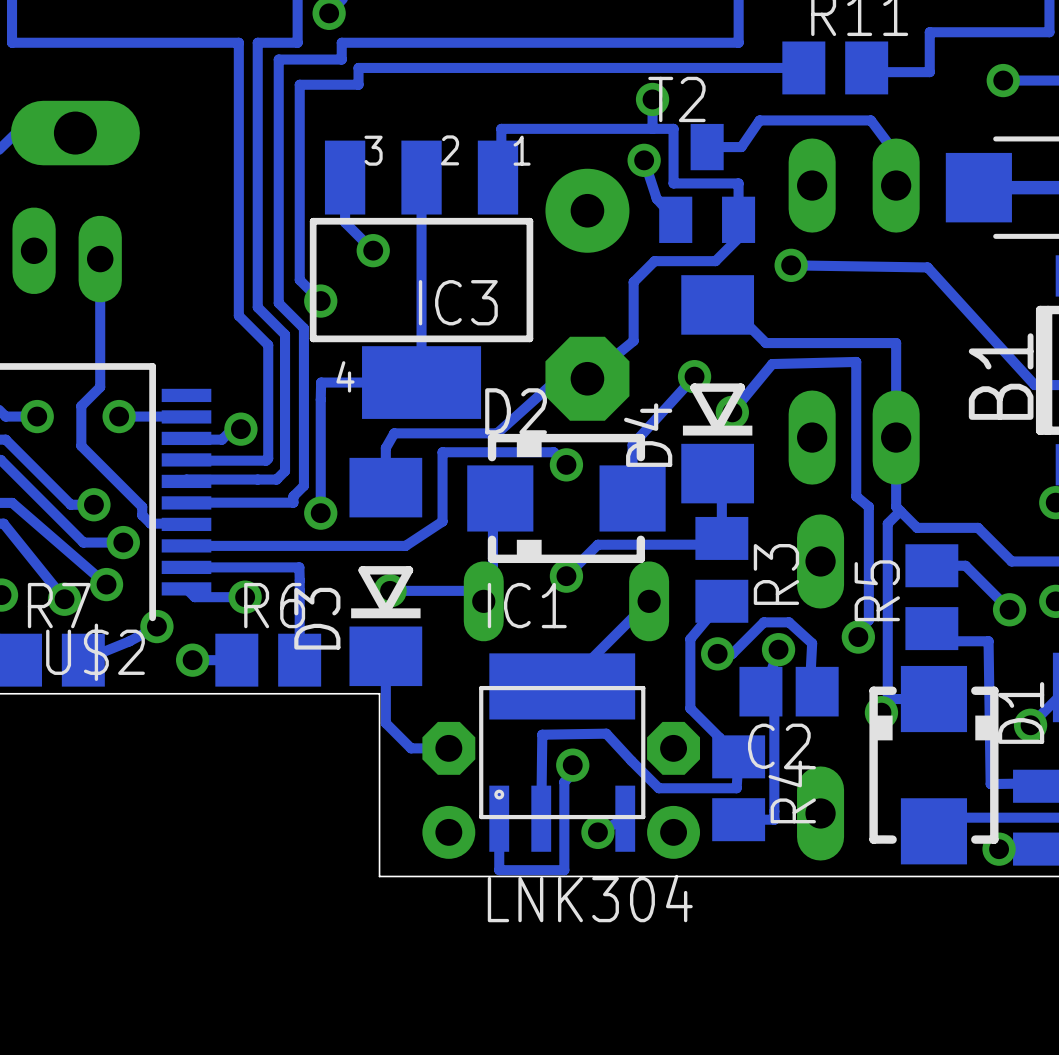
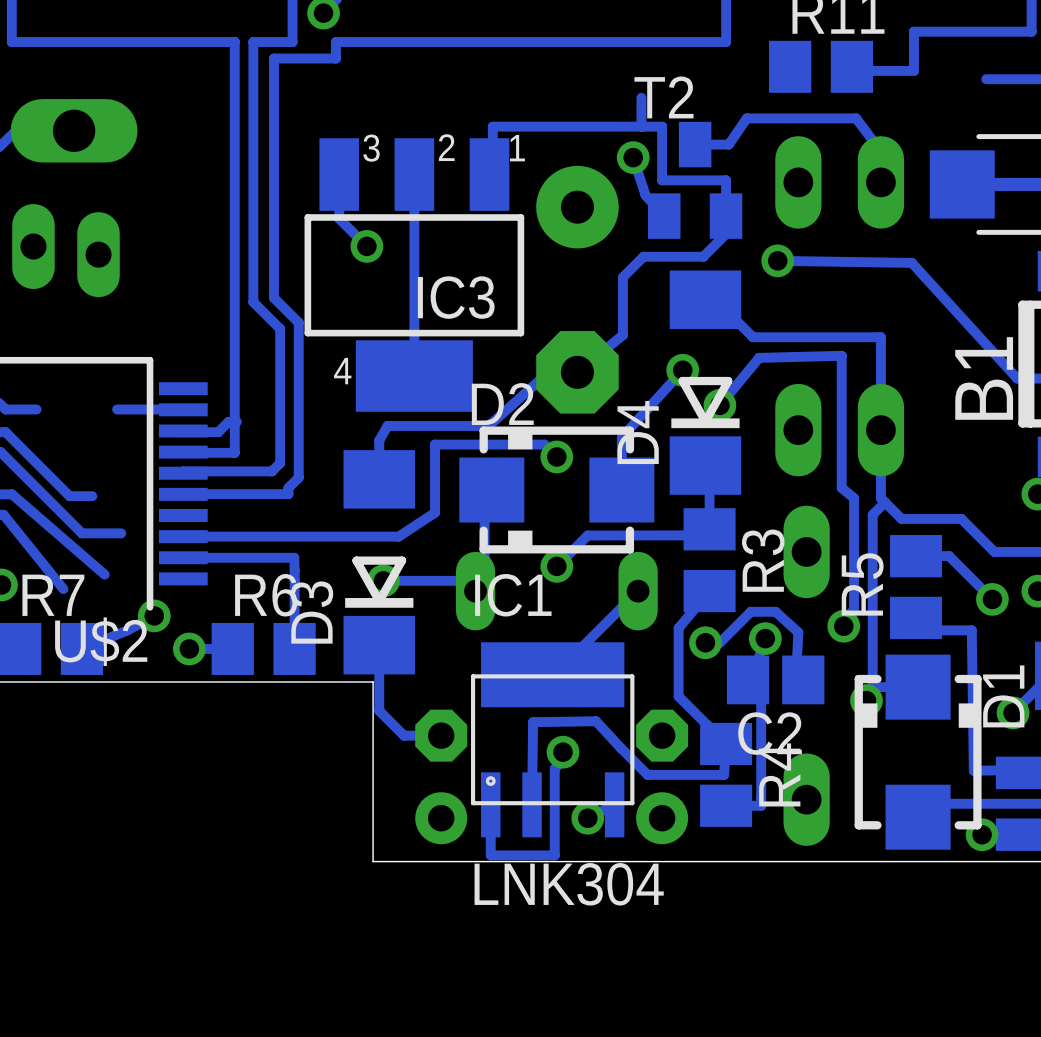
track: (803, 67) (358, 67) (358, 84) (299, 84) (299, 280) (320, 301) -> none
via: (1003, 80) -> none
via: (652, 99) -> none
track: (100, 259) (100, 387) (81, 406) (81, 445) (142, 506) (142, 515) (150, 523) (186, 524) -> none
via: (320, 301) -> none
track: (238, 315) (268, 345) (268, 458) (266, 460) (238, 460) -> (234, 310) (234, 452)
track: (421, 382) (321, 382) (320, 513) -> none
via: (37, 416) -> none
via: (119, 416) -> none
via: (240, 429) -> none
via: (93, 504) -> none
via: (320, 513) -> none
via: (123, 542) -> none
via: (106, 584) -> none
track: (186, 588) (194, 597) (245, 597) -> none
via: (245, 597) -> none
via: (64, 599) -> none

